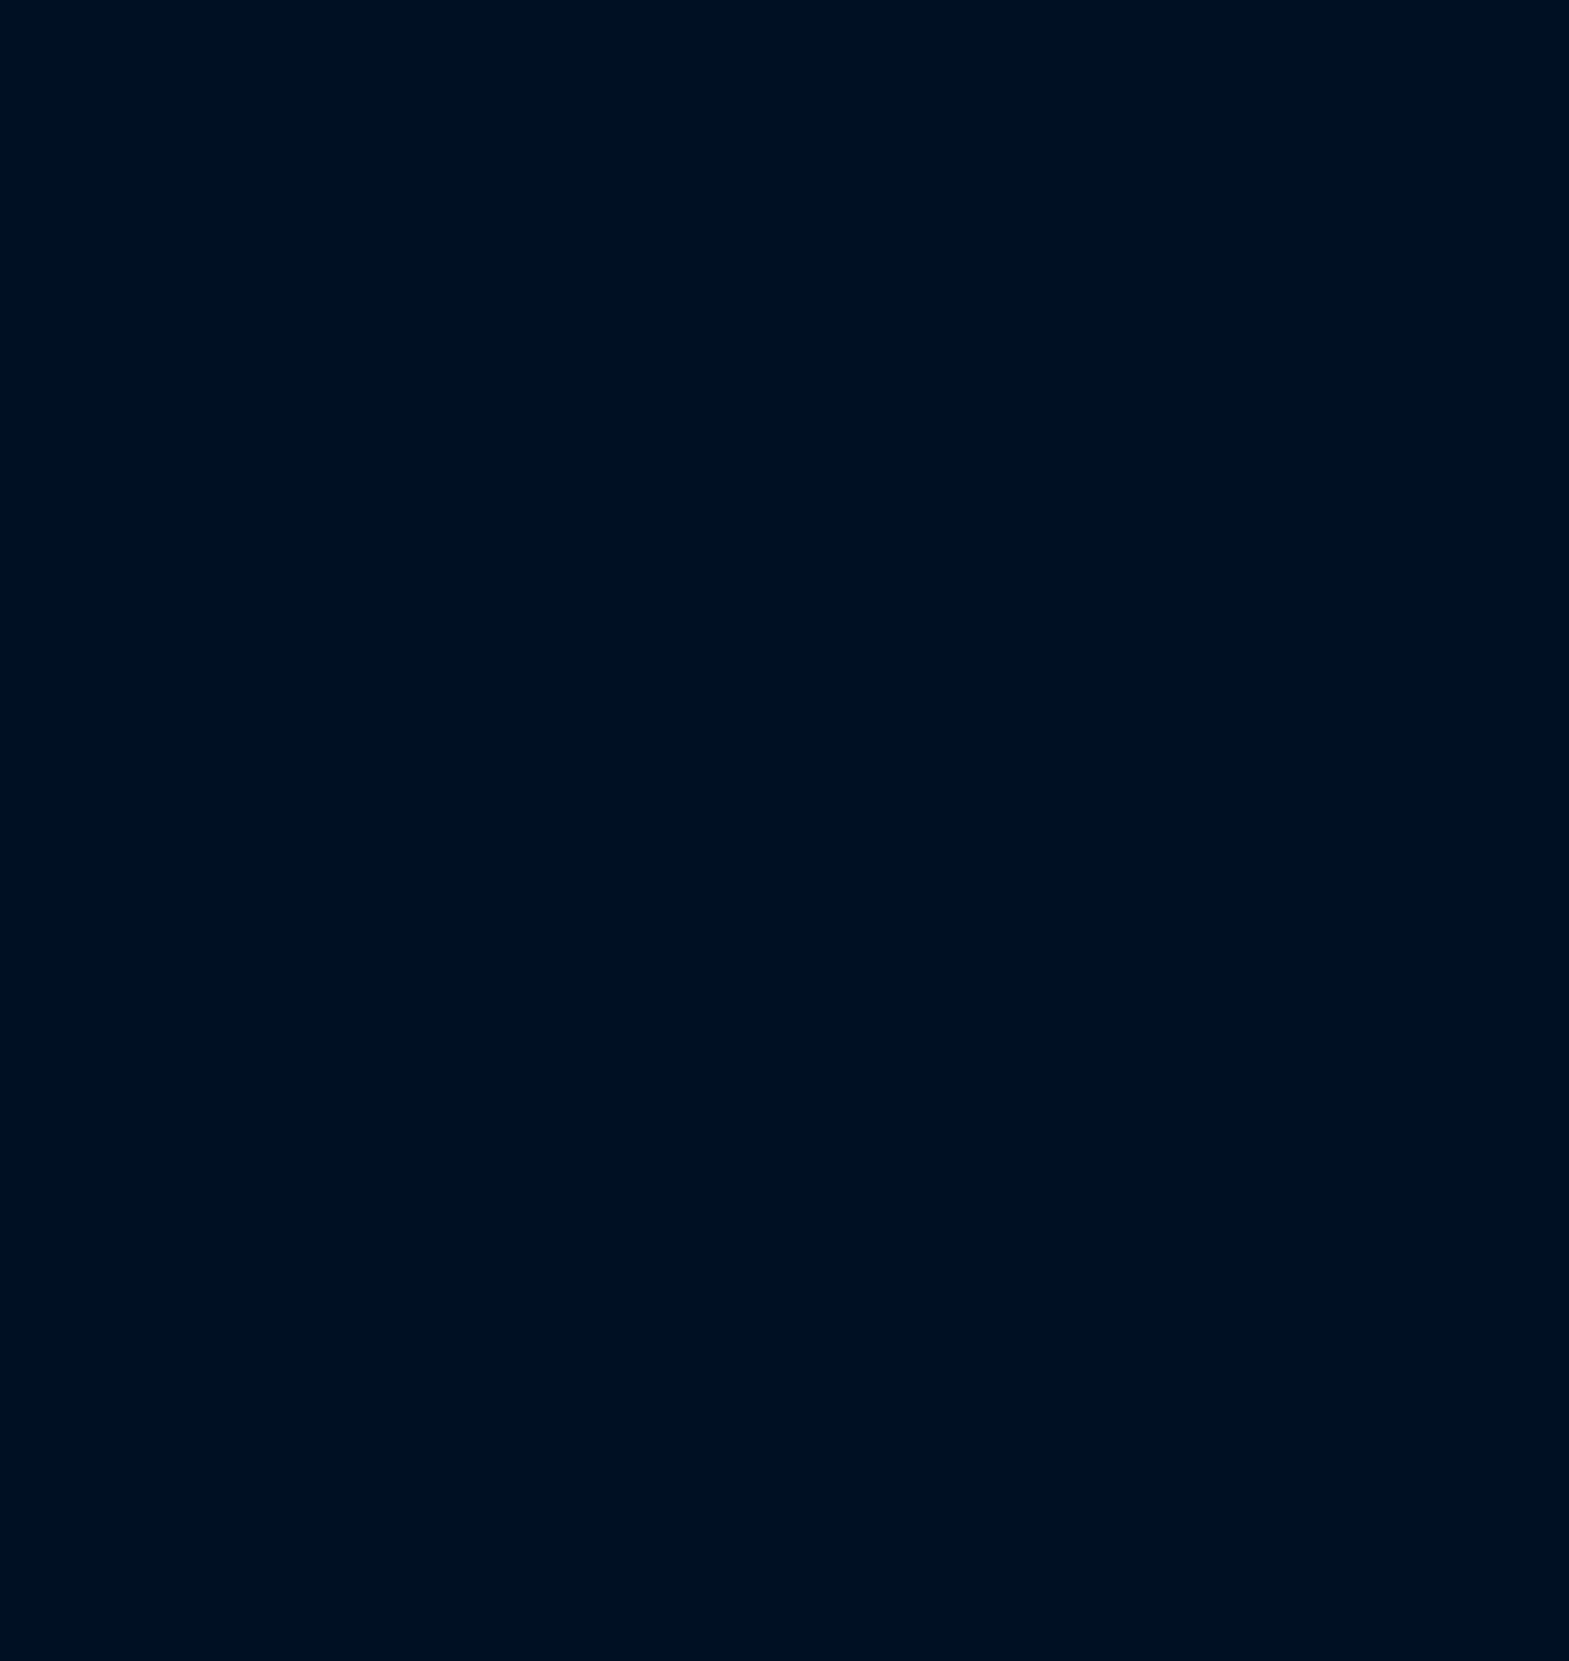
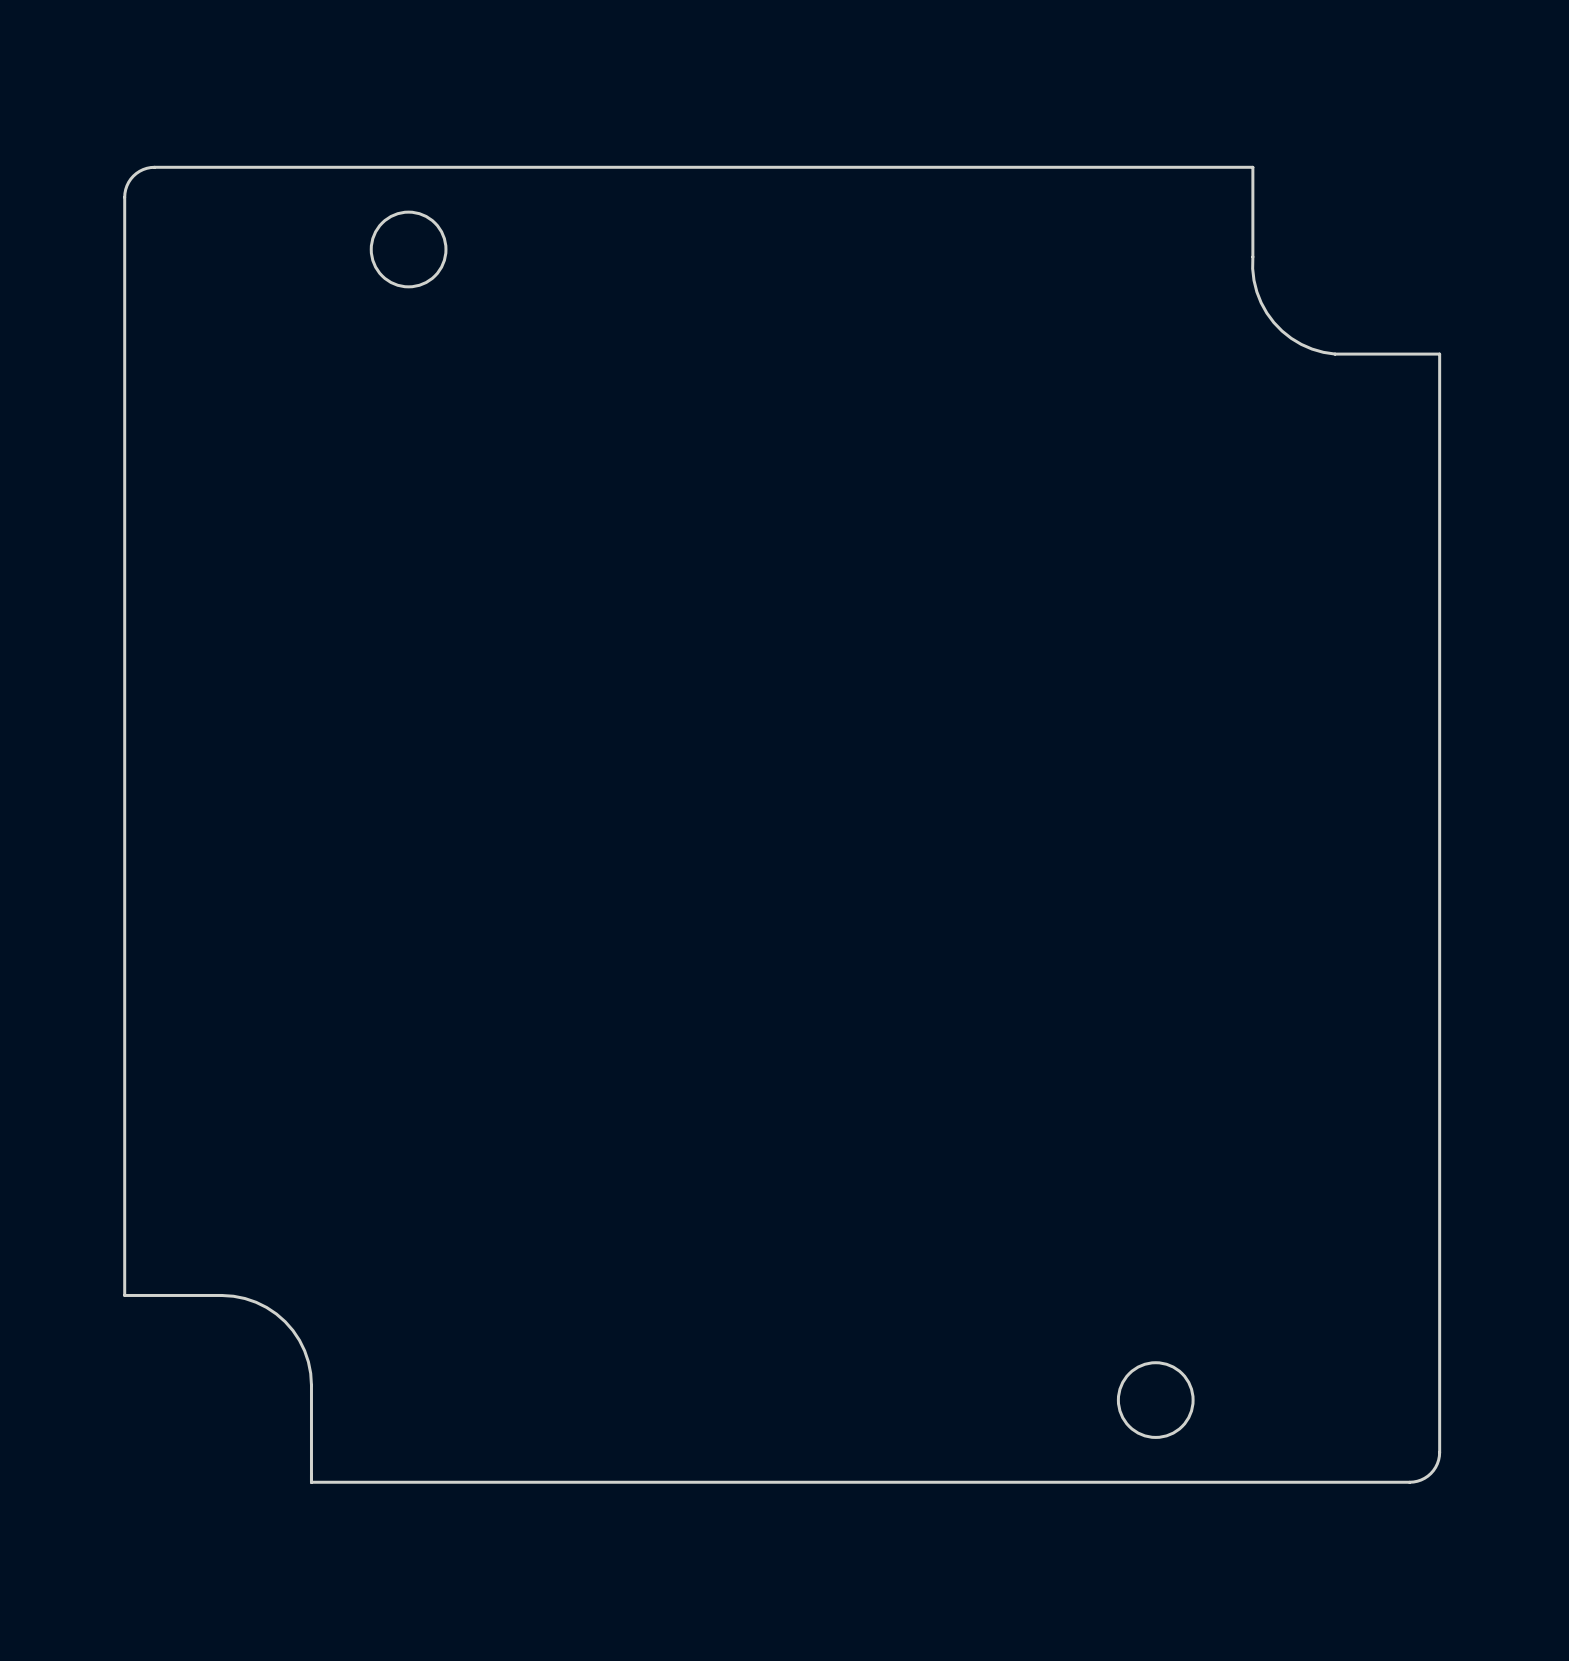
board edge: none -> (154, 167) (1252, 167) (1253, 280) (1256, 291) (1266, 313) (1282, 331) (1301, 344) (1312, 349) (1335, 354) (1439, 354) (1439, 1452) (1437, 1463) (1430, 1473) (1421, 1479) (1409, 1482) (311, 1482) (310, 1373) (308, 1361) (299, 1340) (285, 1321) (266, 1307) (245, 1298) (233, 1296) (124, 1295) (124, 197) (126, 185) (133, 176) (143, 169) (154, 167)
round board edge: none -> [369, 210, 448, 289]
round board edge: none -> [1116, 1361, 1195, 1439]

